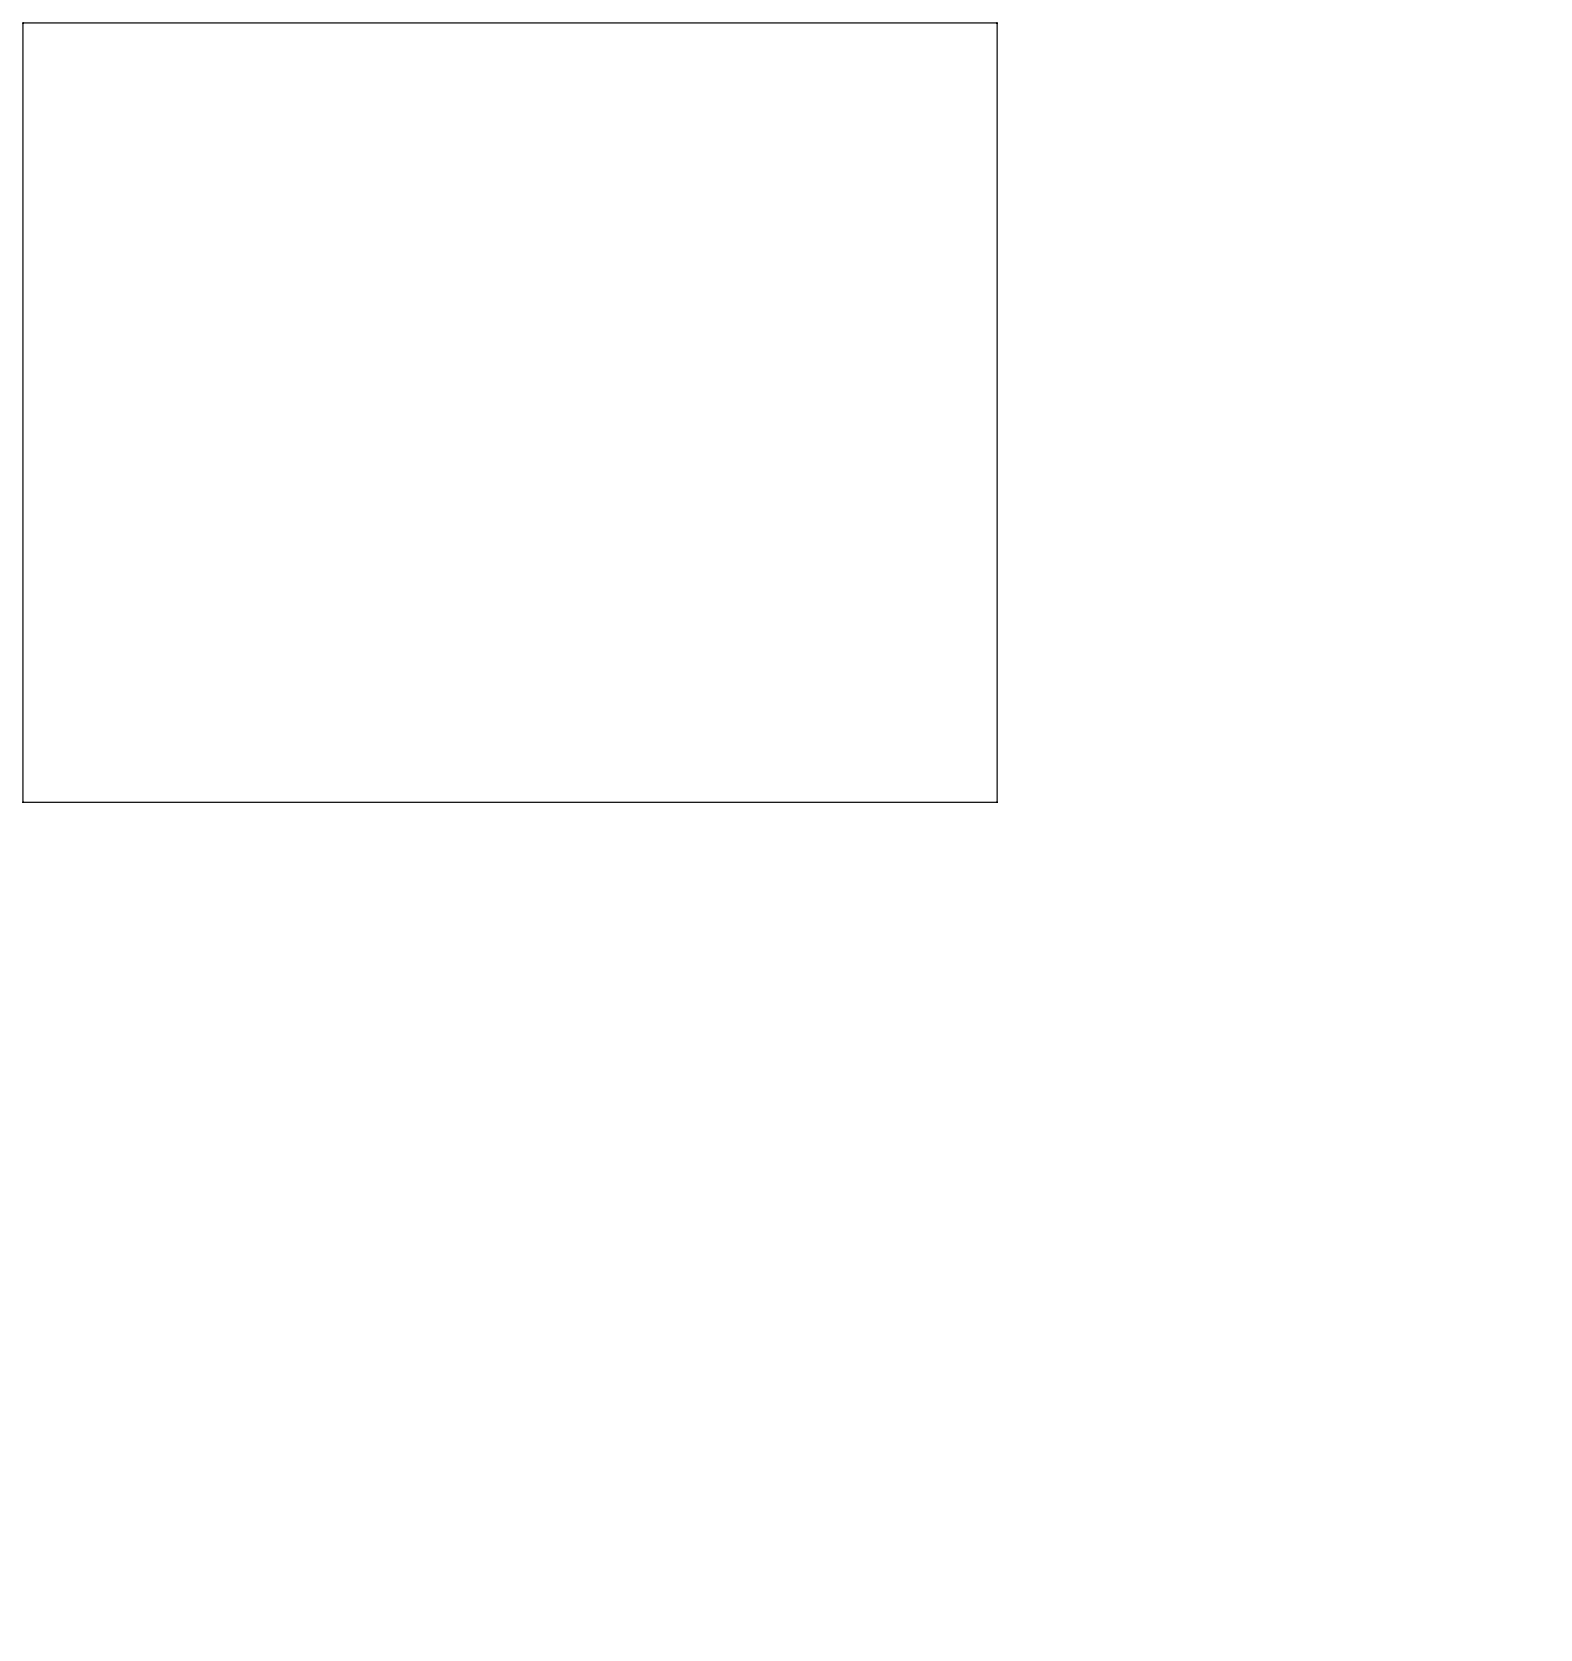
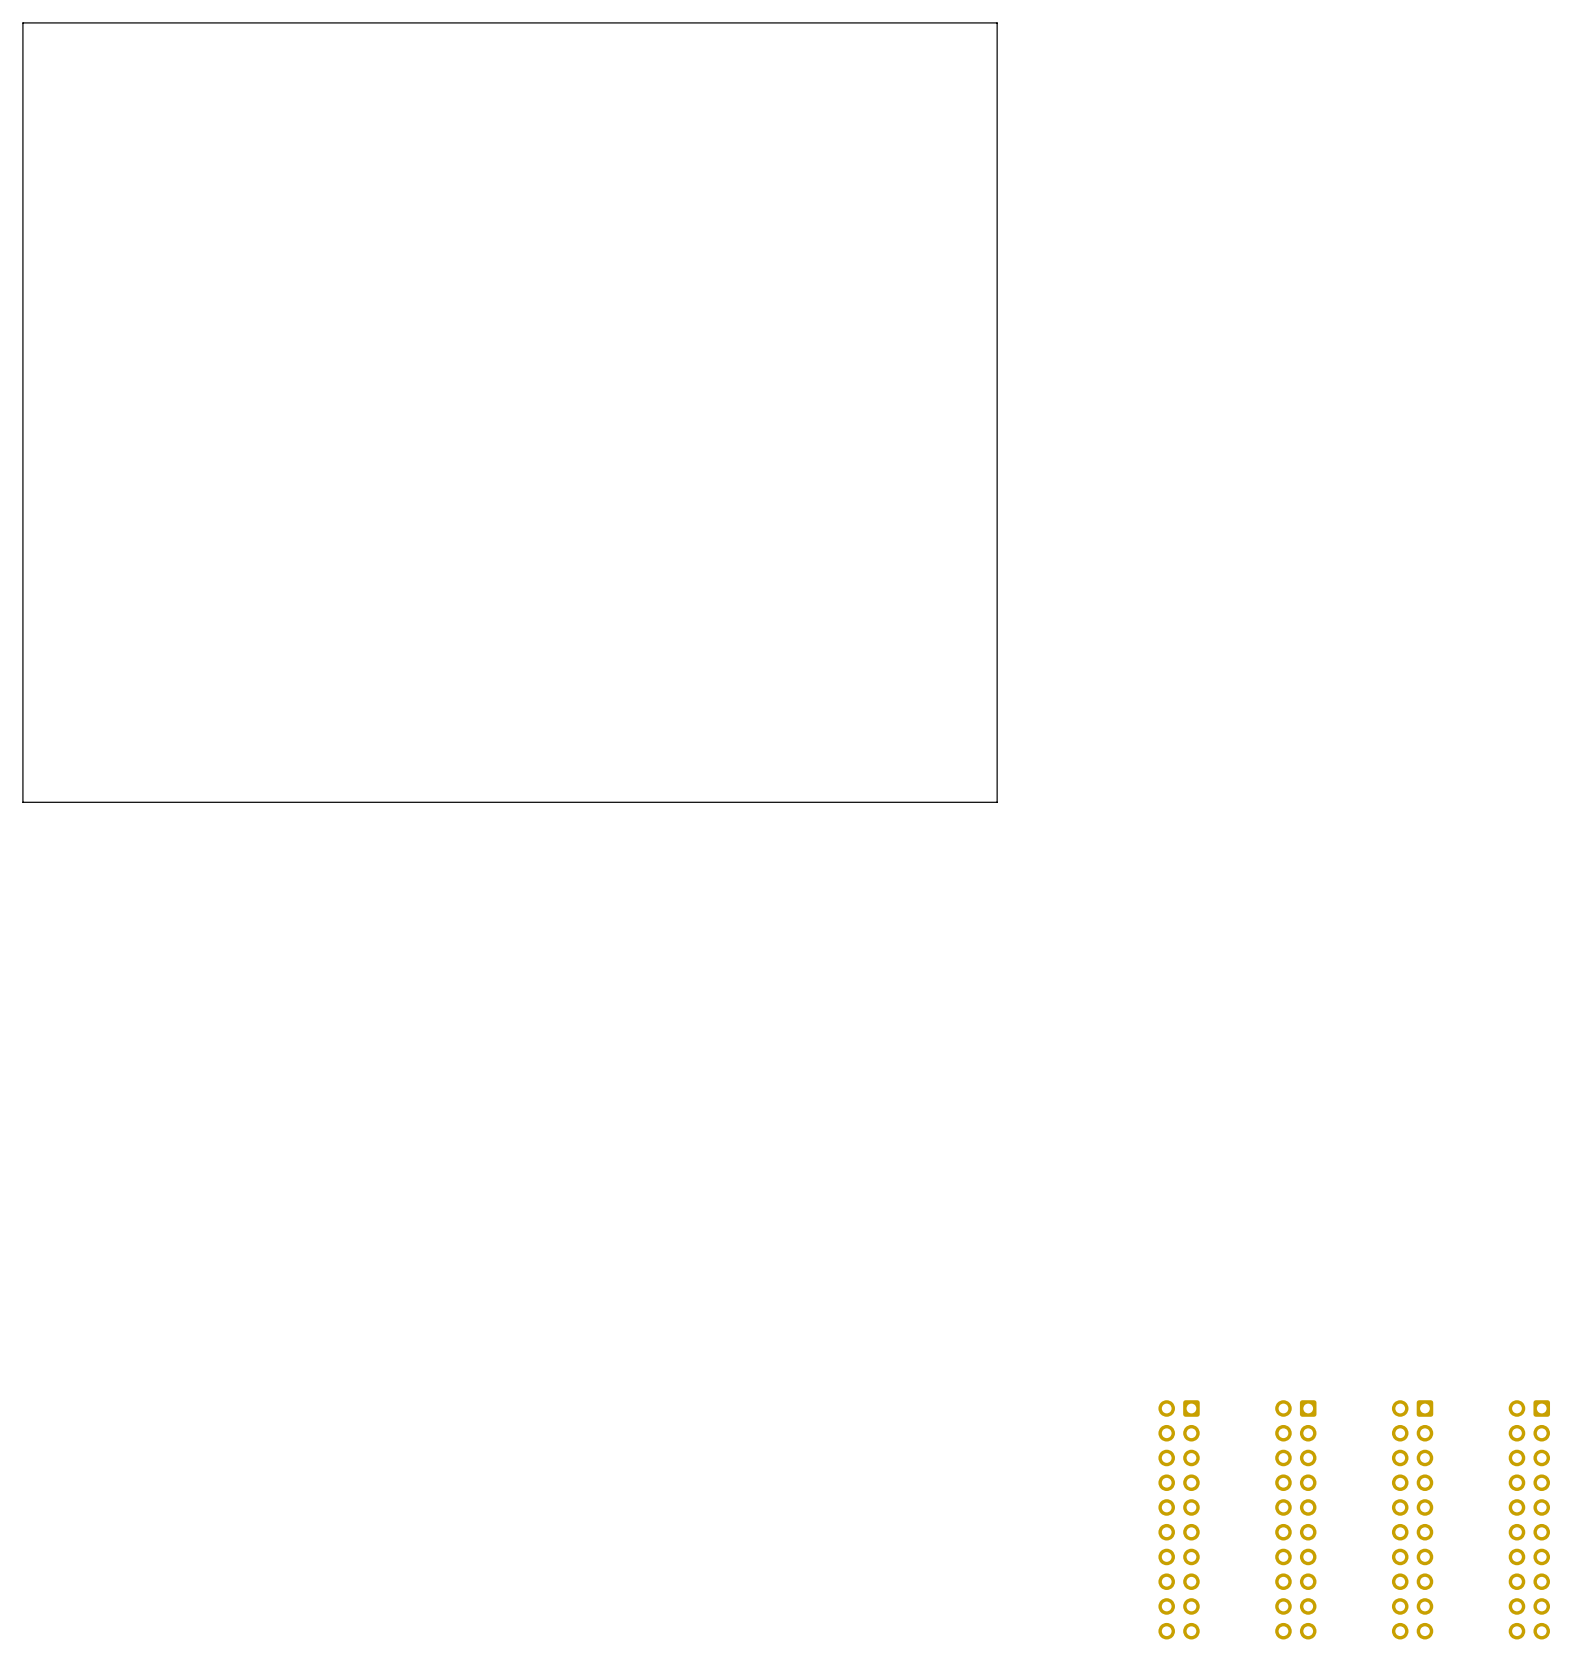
part: none -> (1179, 1519)
part: none -> (1295, 1519)
part: none -> (1412, 1519)
part: none -> (1529, 1519)

